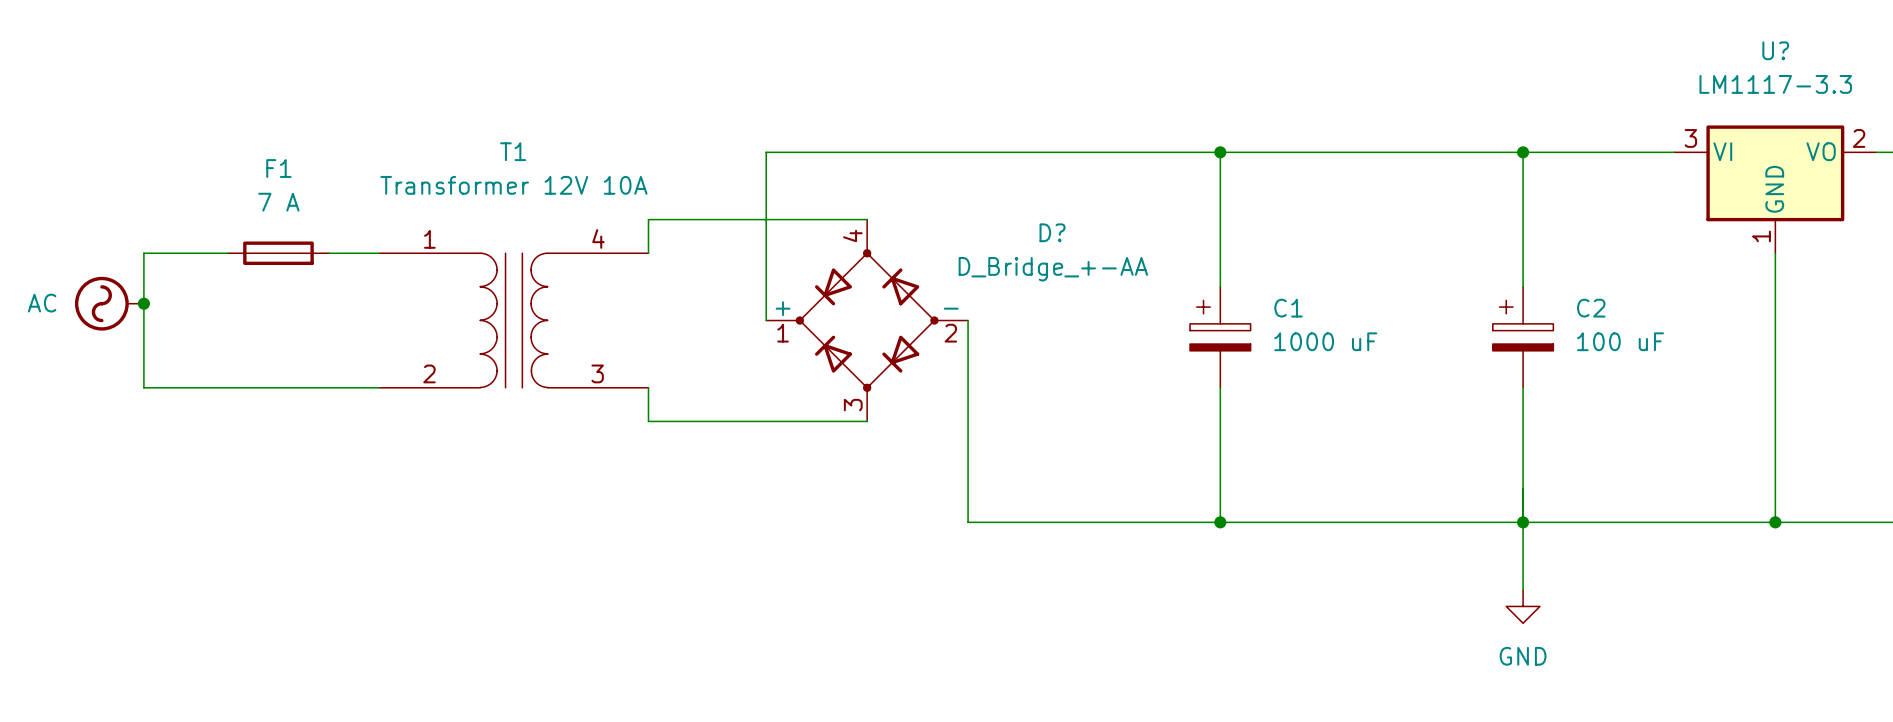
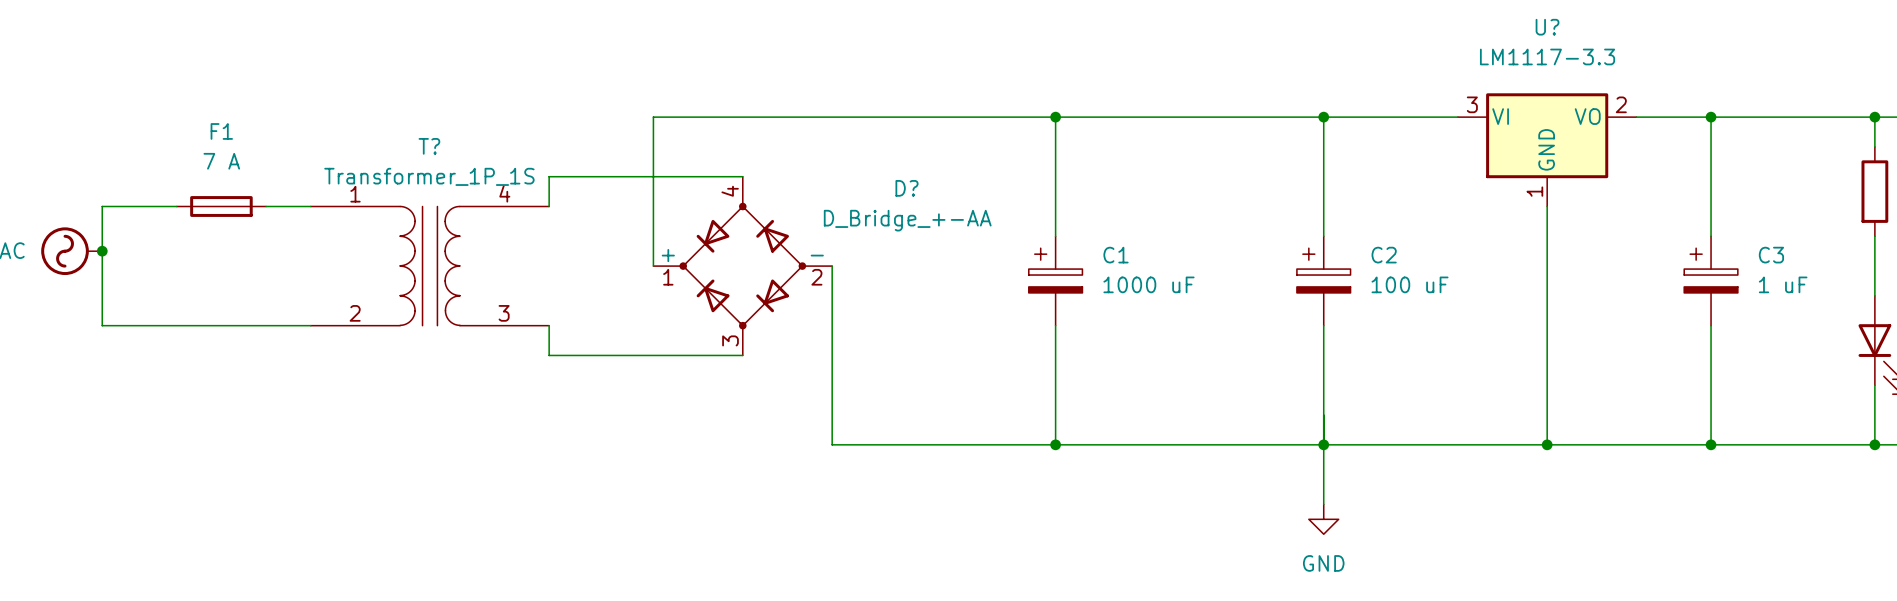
T1 name: T1 (513, 151) -> T? (429, 146)
T1 value: Transformer 12V 10A (513, 185) -> Transformer_1P_1S (429, 176)

